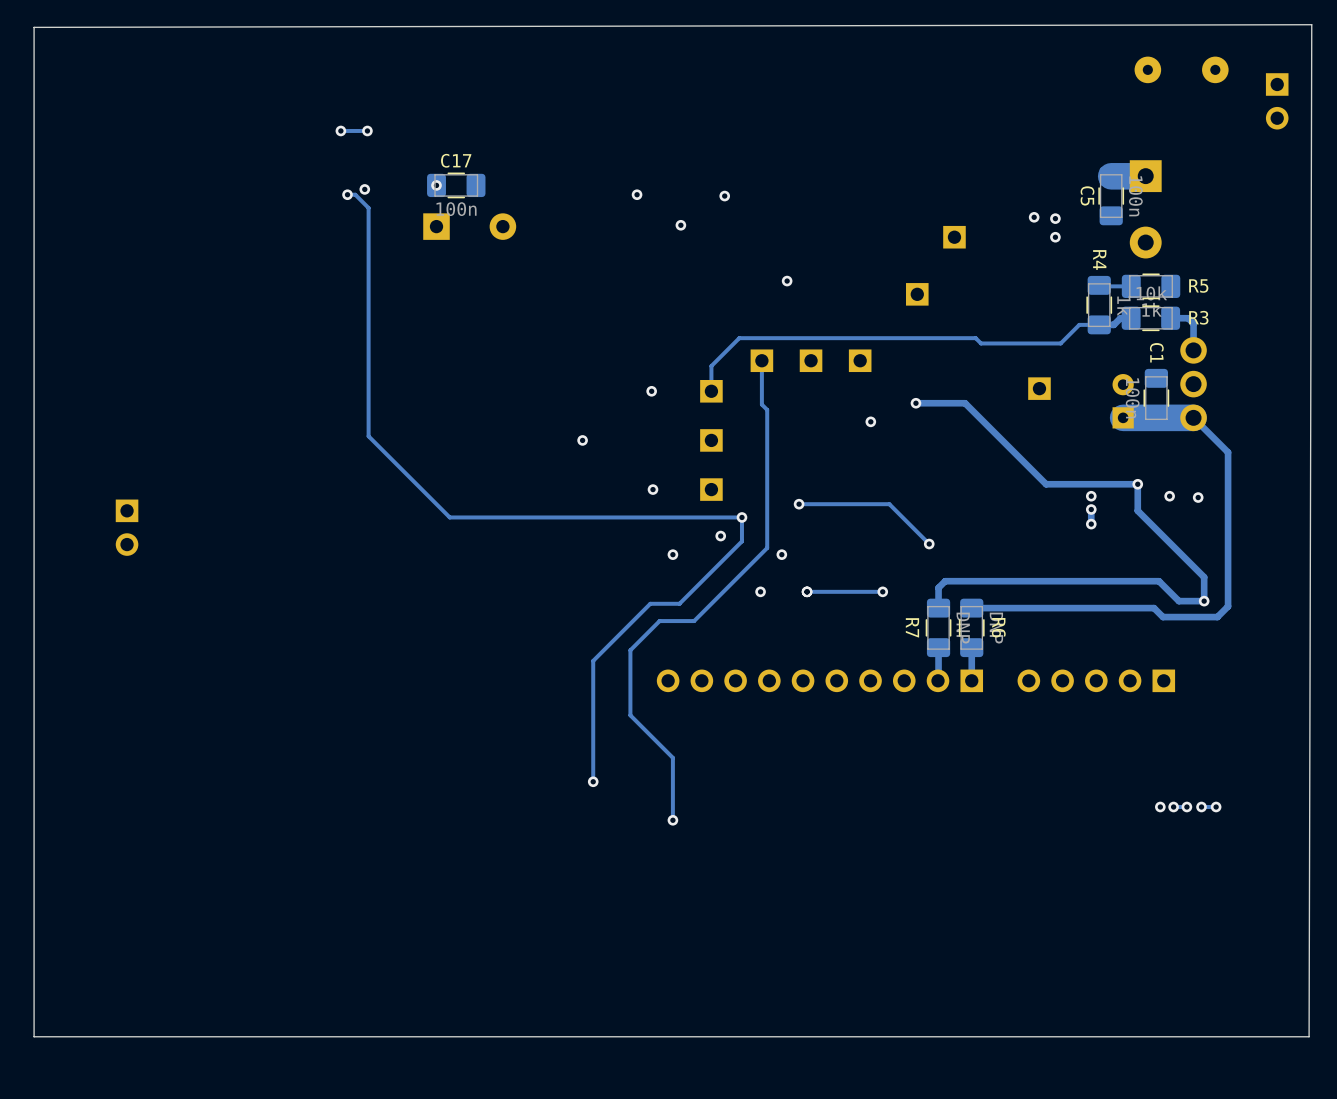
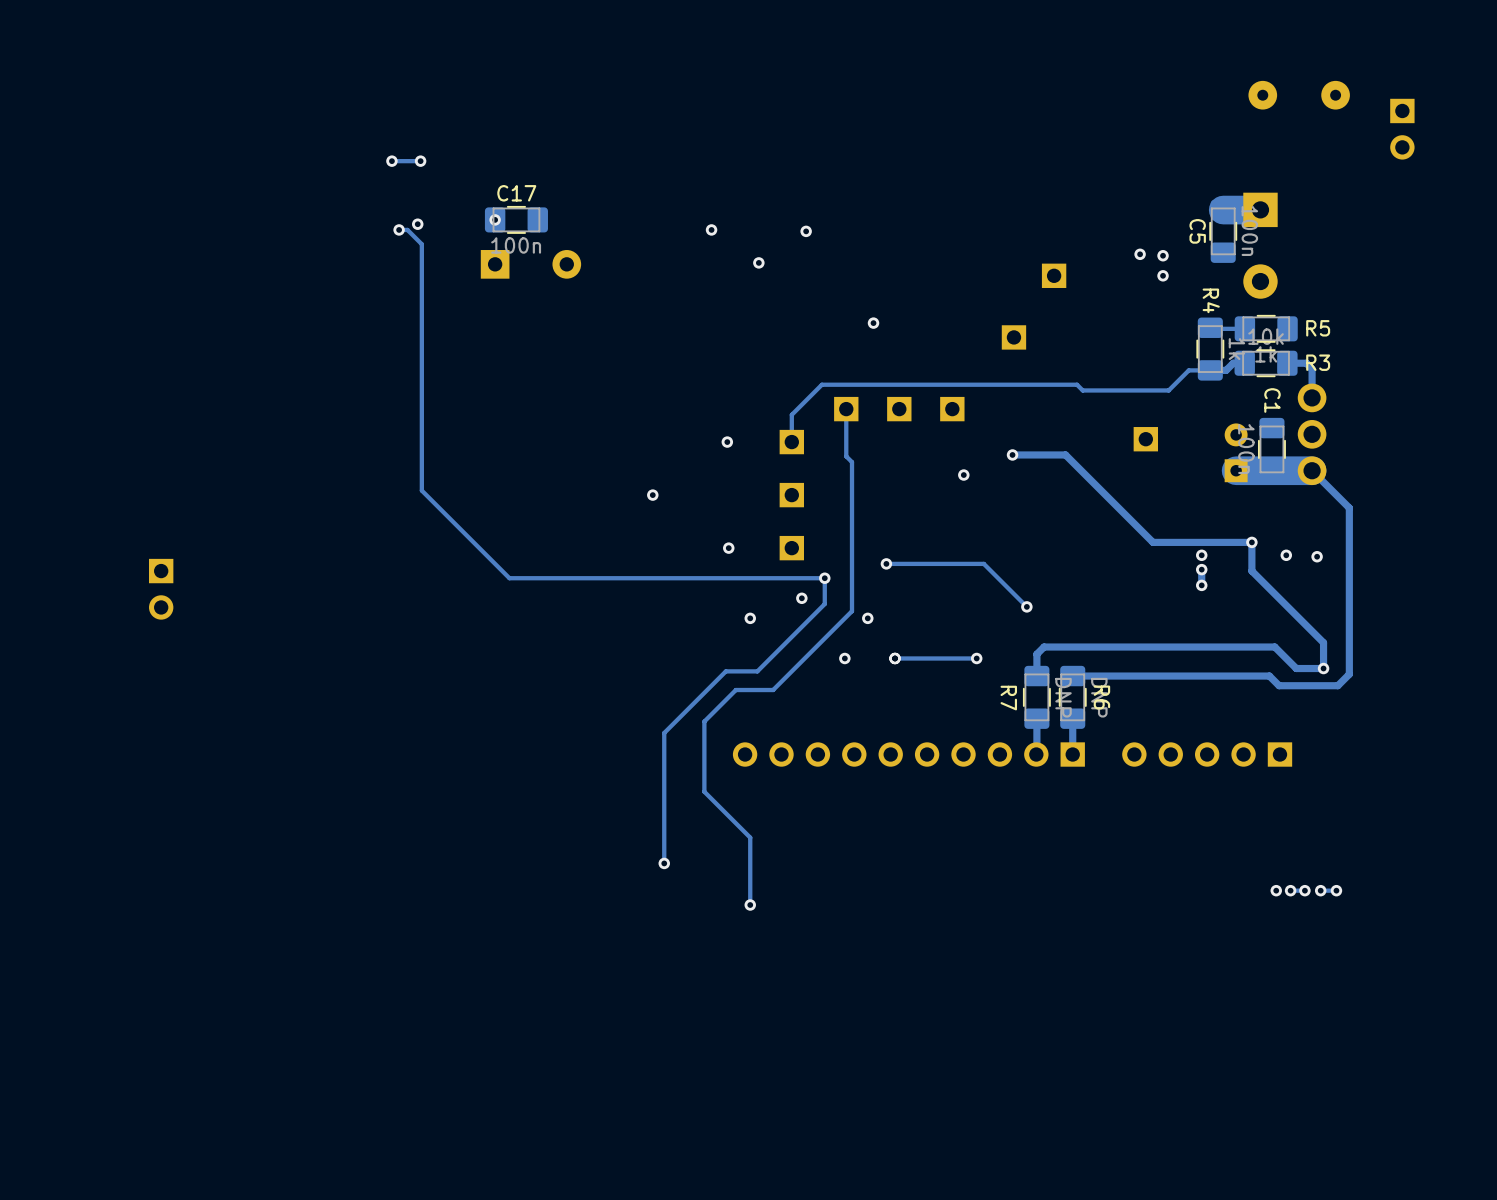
board edge: (1311, 24) (1309, 1036) (34, 1036) (34, 27) (1311, 24) -> none

